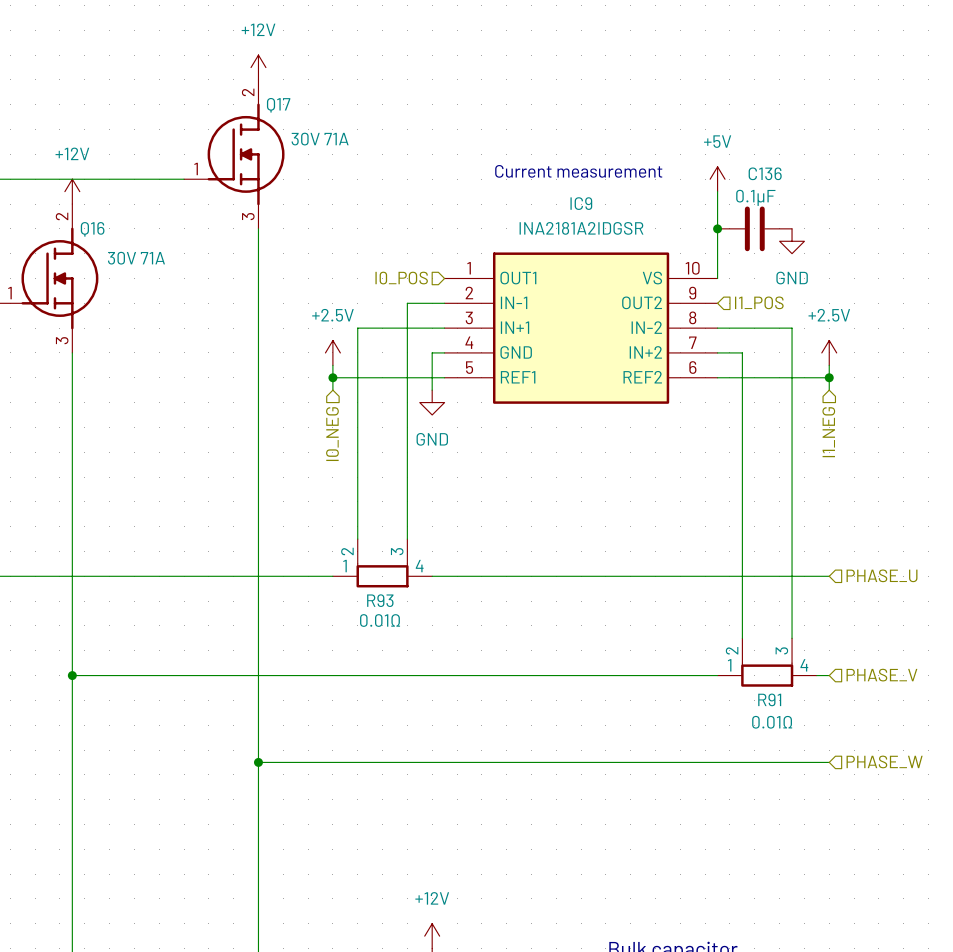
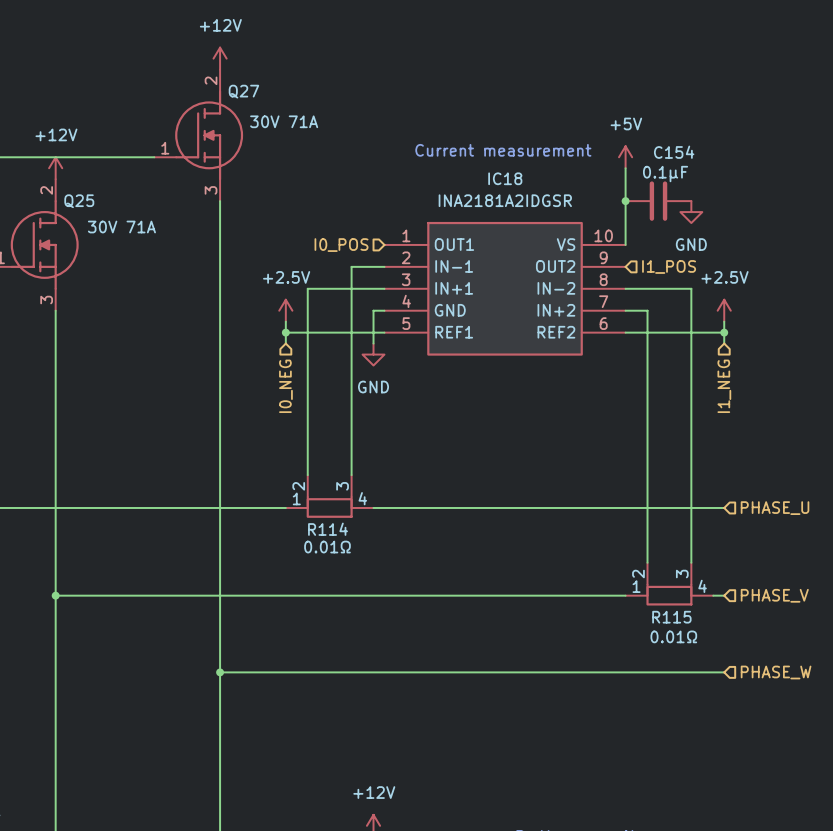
Q17 name: Q17 (278, 105) -> Q27 (243, 91)
C136 name: C136 (765, 173) -> C154 (674, 152)
IC9 name: IC9 (581, 203) -> IC18 (505, 178)
Q16 name: Q16 (92, 229) -> Q25 (79, 201)
R93 name: R93 (380, 600) -> R114 (328, 529)
R91 name: R91 (769, 699) -> R115 (671, 617)

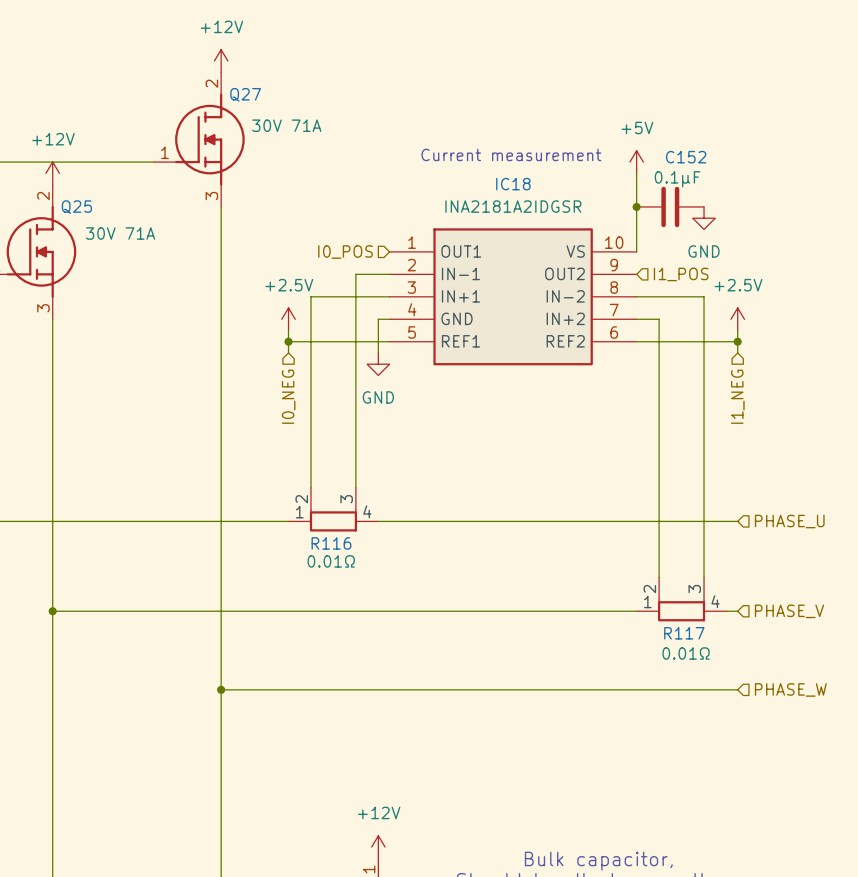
C154 name: C154 (674, 152) -> C152 (686, 157)
R114 name: R114 (328, 529) -> R116 (331, 543)
R115 name: R115 (671, 617) -> R117 (684, 633)

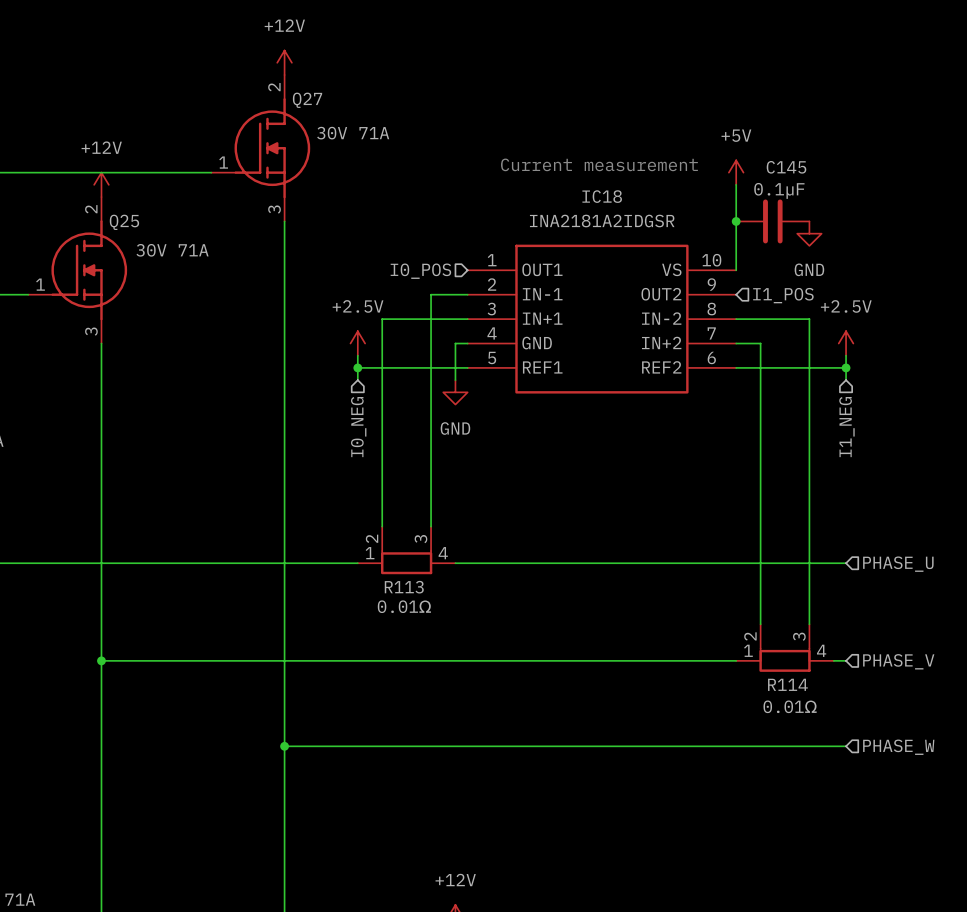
C152 name: C152 (686, 157) -> C145 (786, 167)
R116 name: R116 (331, 543) -> R113 (404, 587)
R117 name: R117 (684, 633) -> R114 (787, 684)

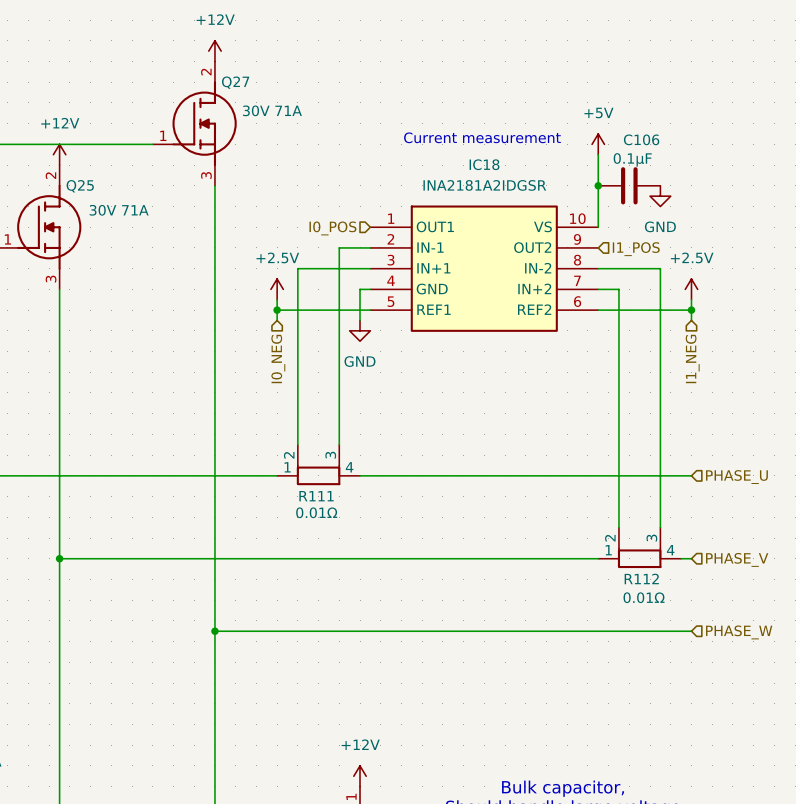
C145 name: C145 (786, 167) -> C106 (641, 139)
R113 name: R113 (404, 587) -> R111 (316, 496)
R114 name: R114 (787, 684) -> R112 (641, 578)

